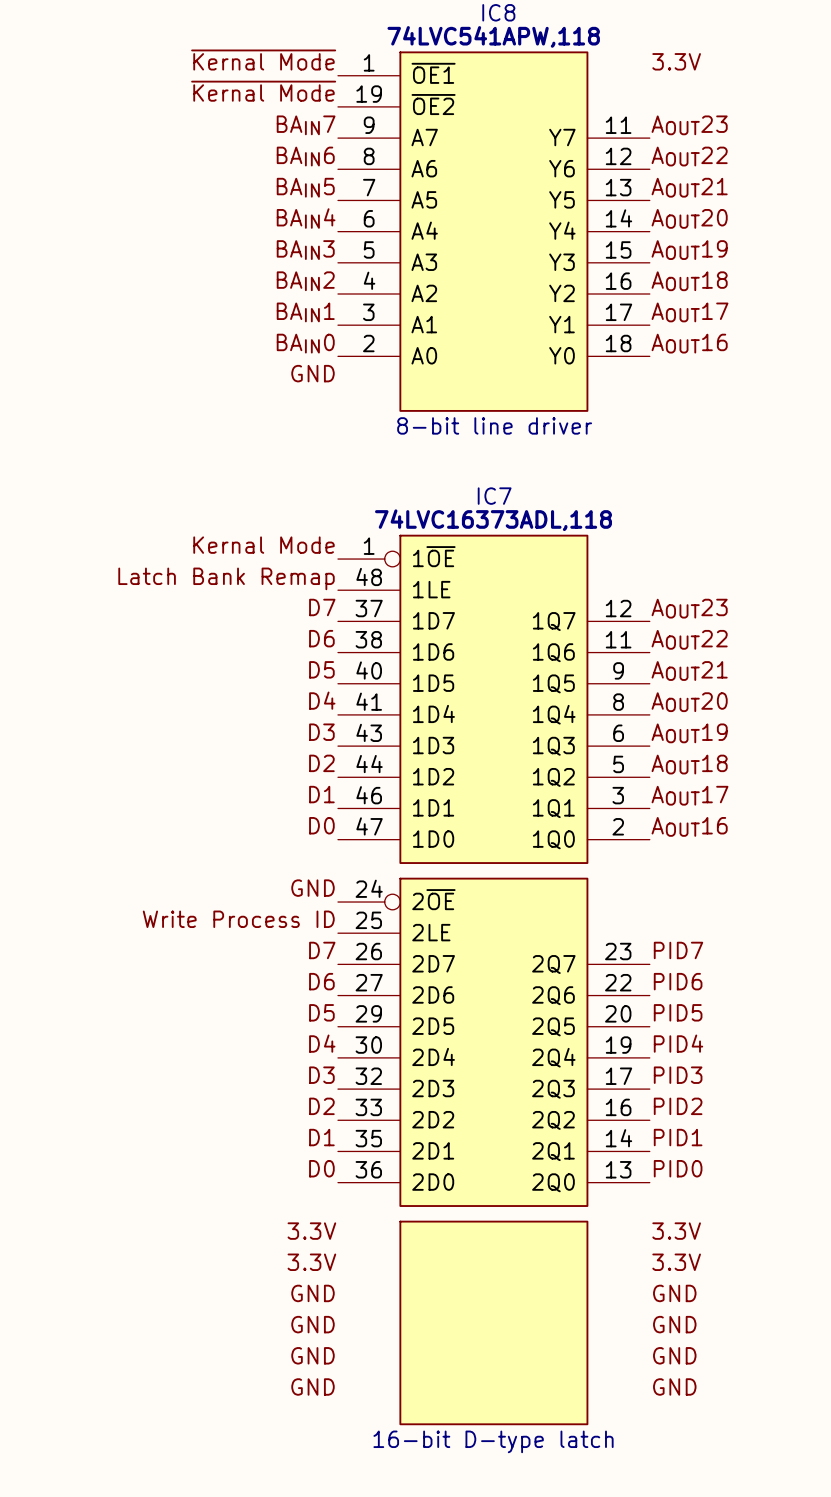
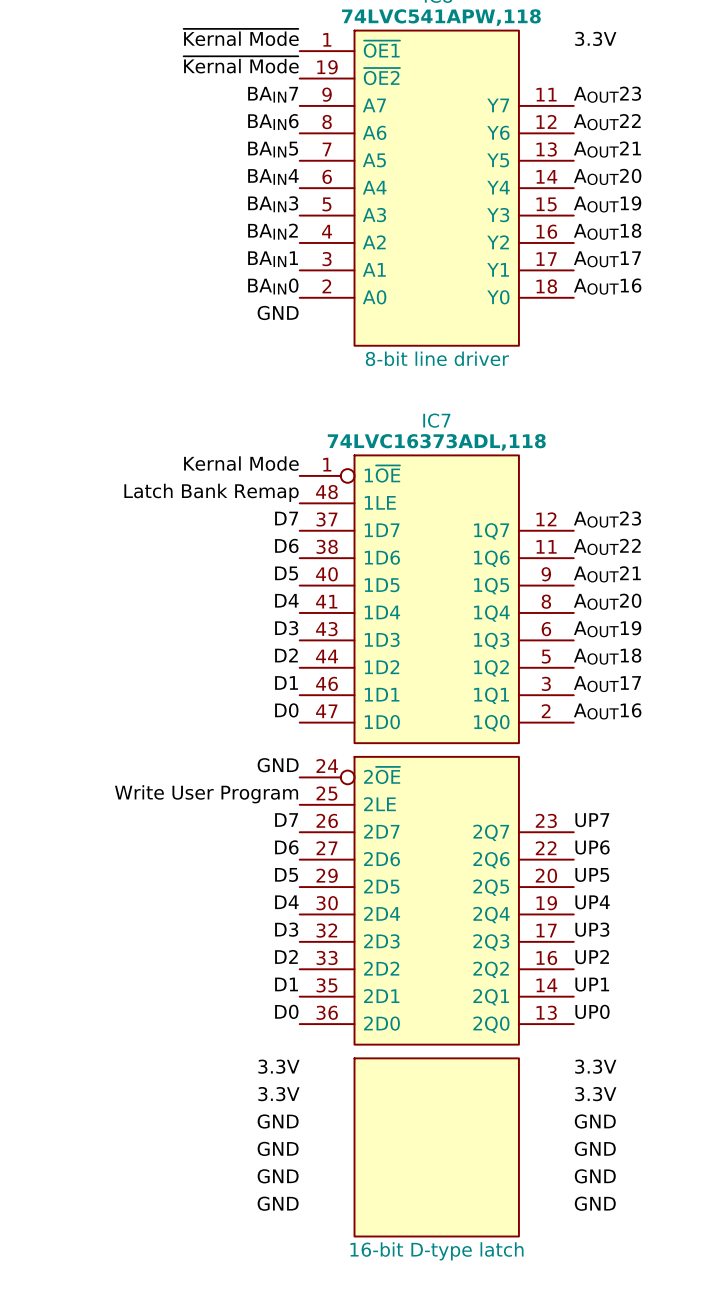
label: Write Process ID (238, 919) -> Write User Program (206, 794)
label: PID7 (678, 950) -> UP7 (592, 820)
label: PID6 (678, 981) -> UP6 (592, 847)
label: PID5 (678, 1012) -> UP5 (592, 874)
label: PID4 (678, 1043) -> UP4 (592, 902)
label: PID3 (678, 1075) -> UP3 (592, 929)
label: PID2 (678, 1106) -> UP2 (592, 957)
label: PID1 (678, 1137) -> UP1 (592, 984)
label: PID0 (678, 1168) -> UP0 (592, 1011)

